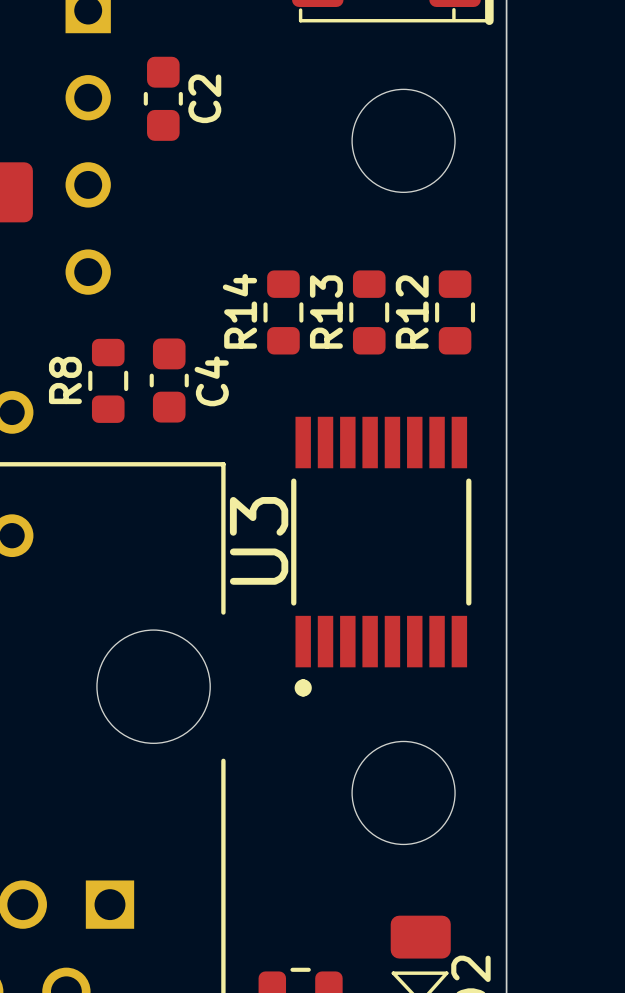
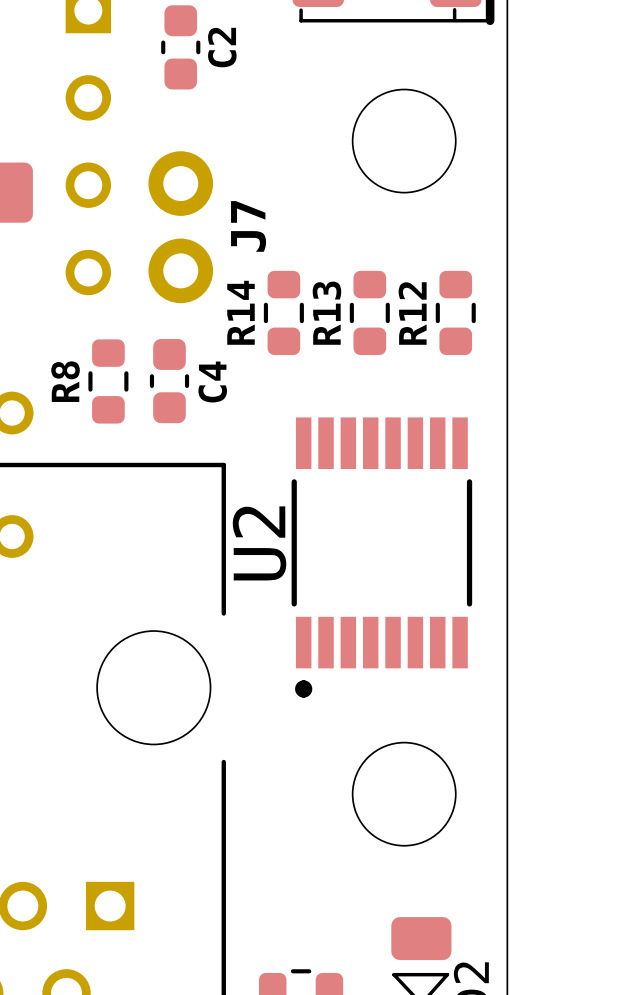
C2 position: (163, 98) -> (180, 47)
J7: none -> (180, 227)
U3 name: U3 (259, 540) -> U2 (259, 543)

